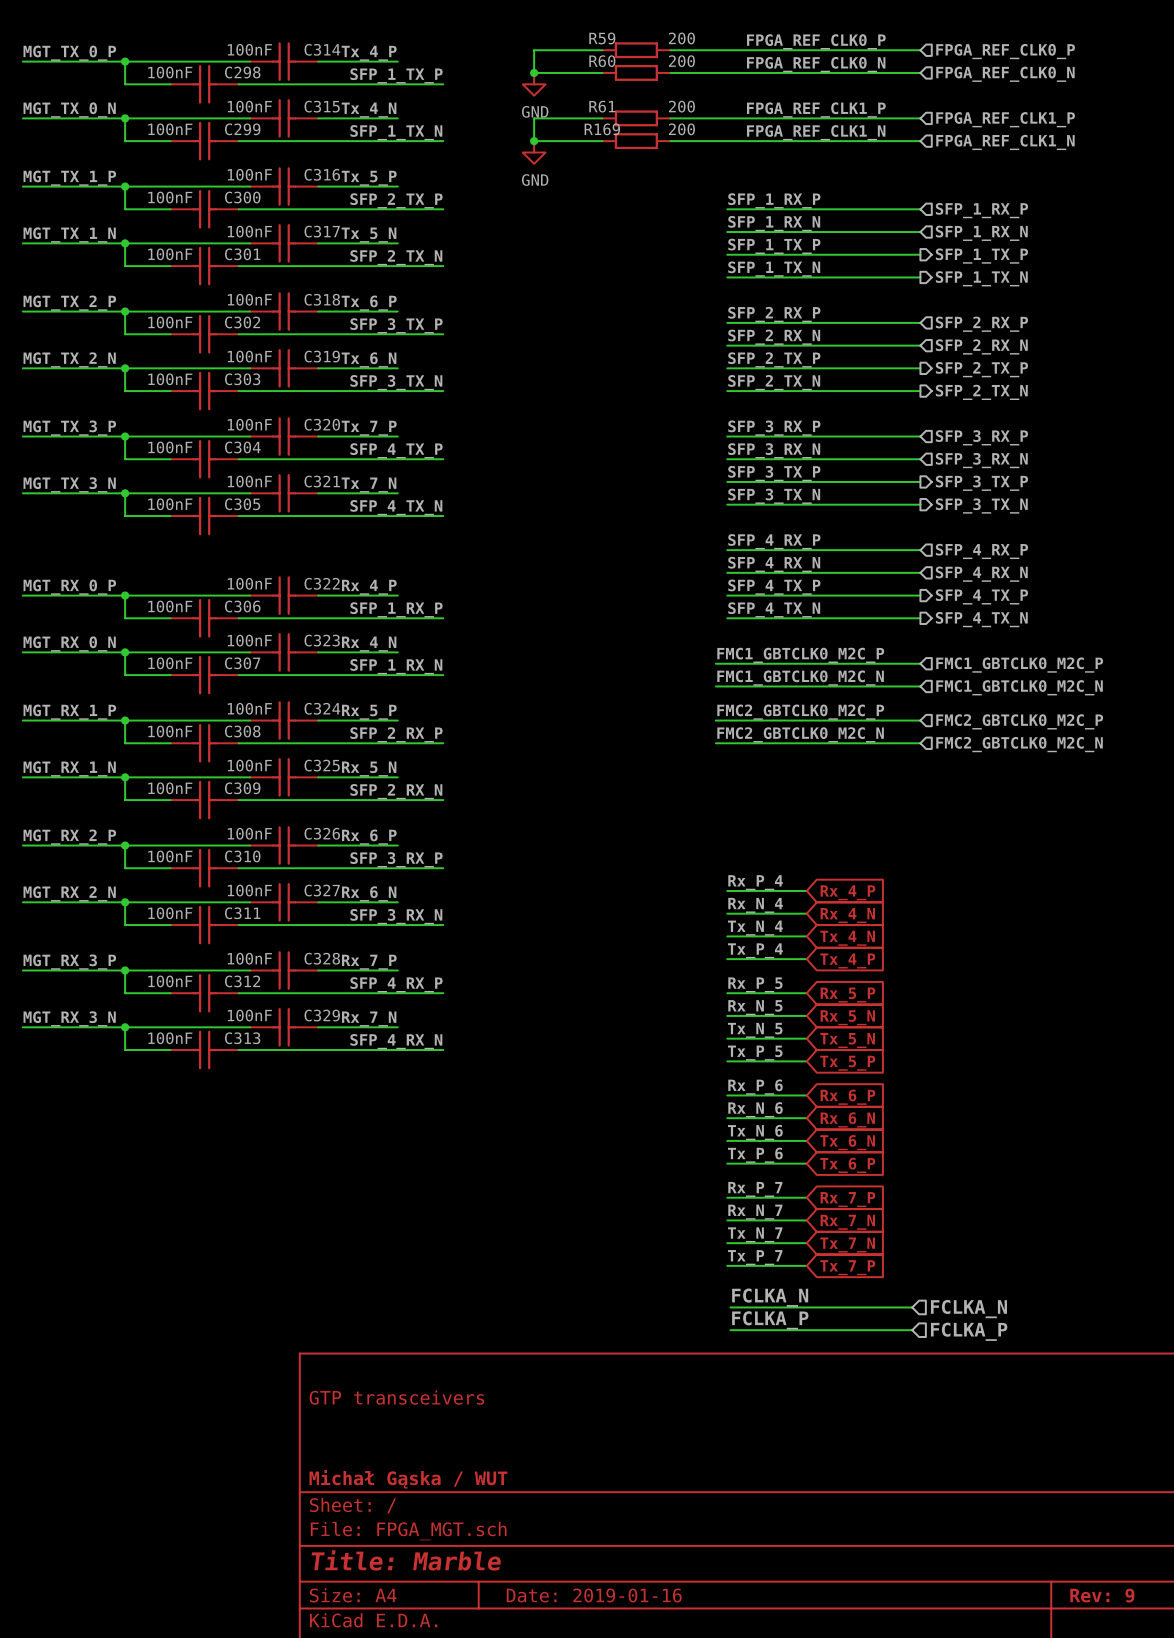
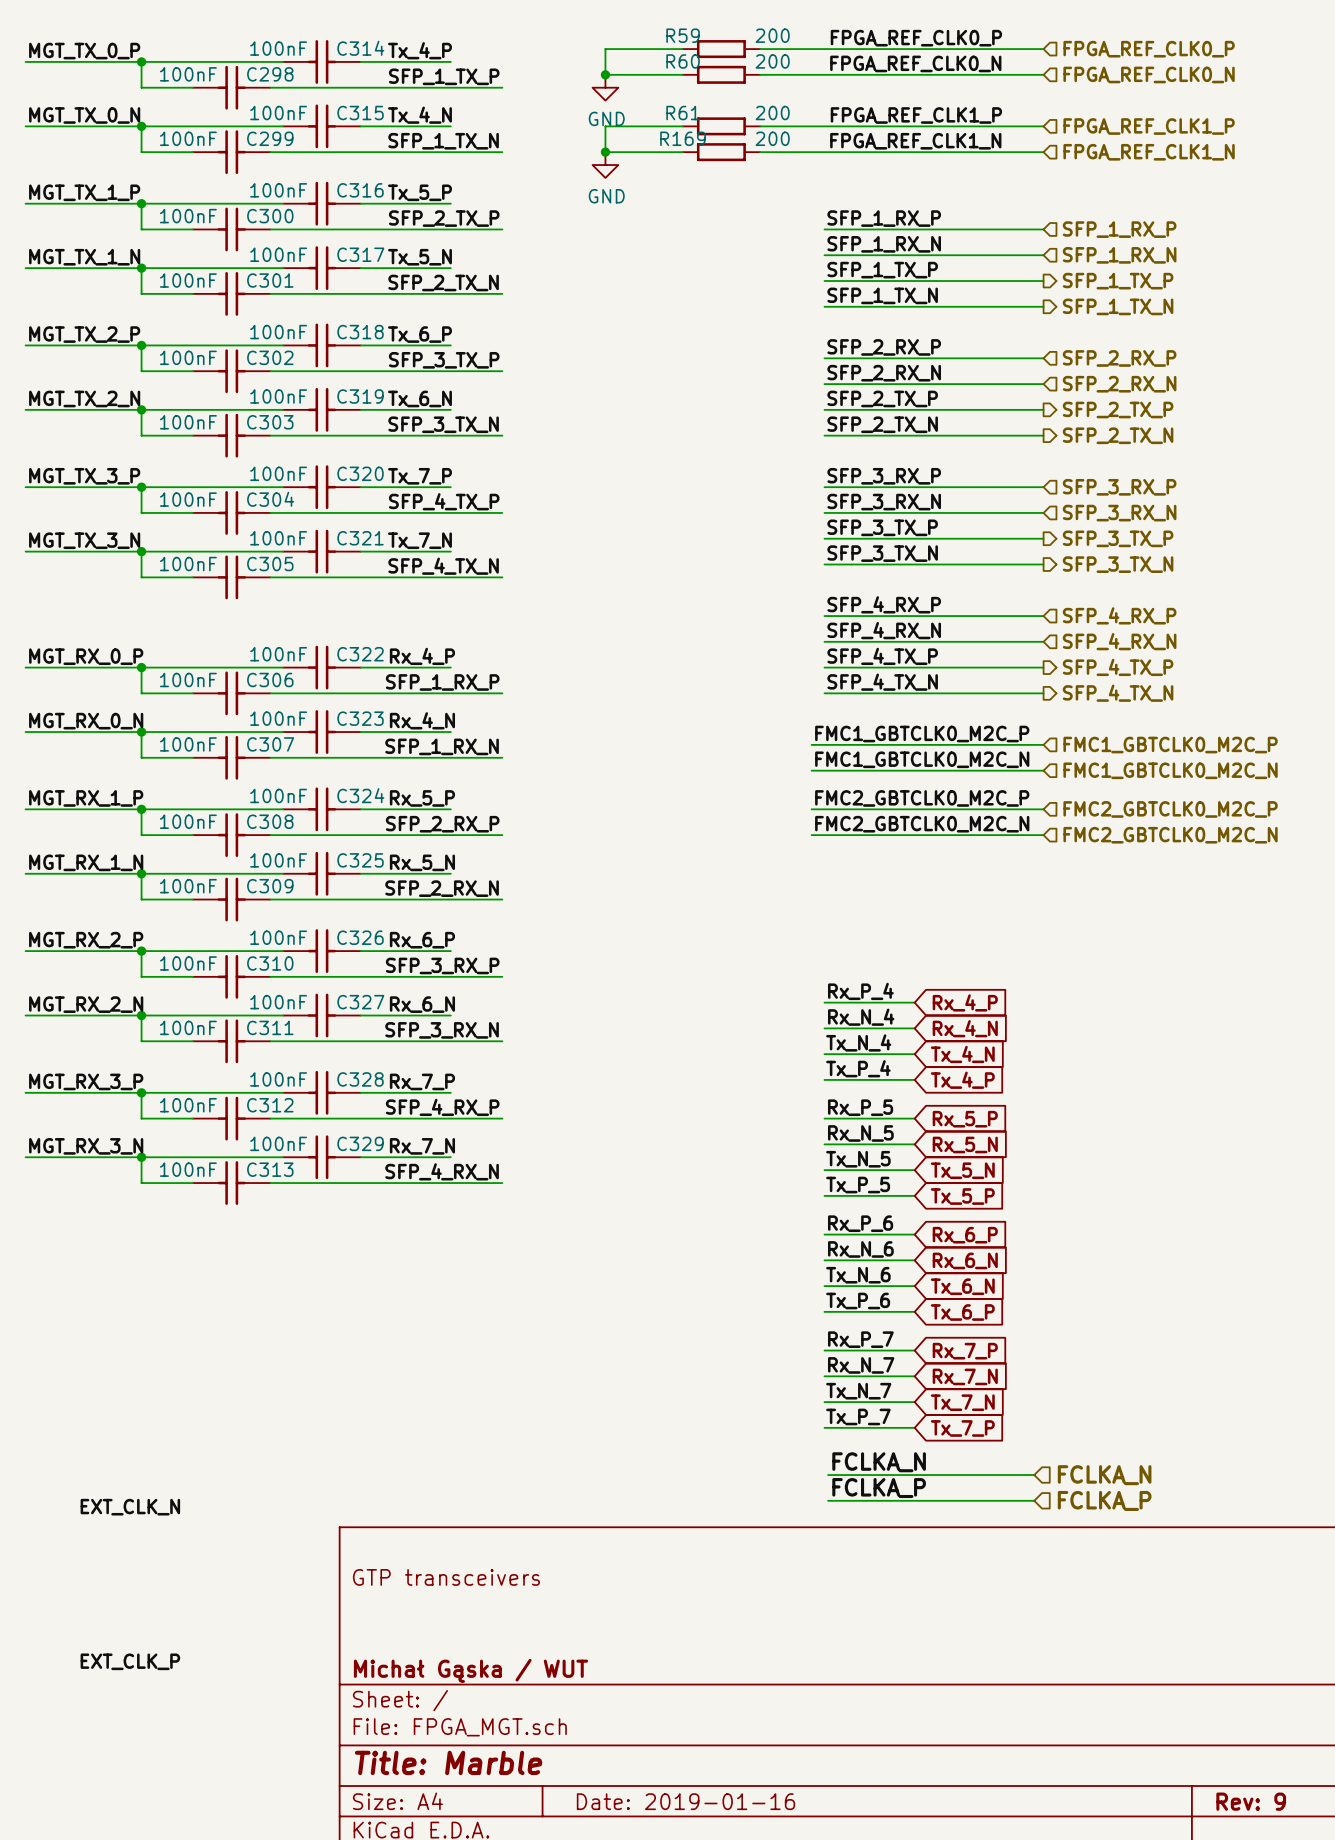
label: none -> EXT_CLK_N (130, 1507)
label: none -> EXT_CLK_P (130, 1661)

